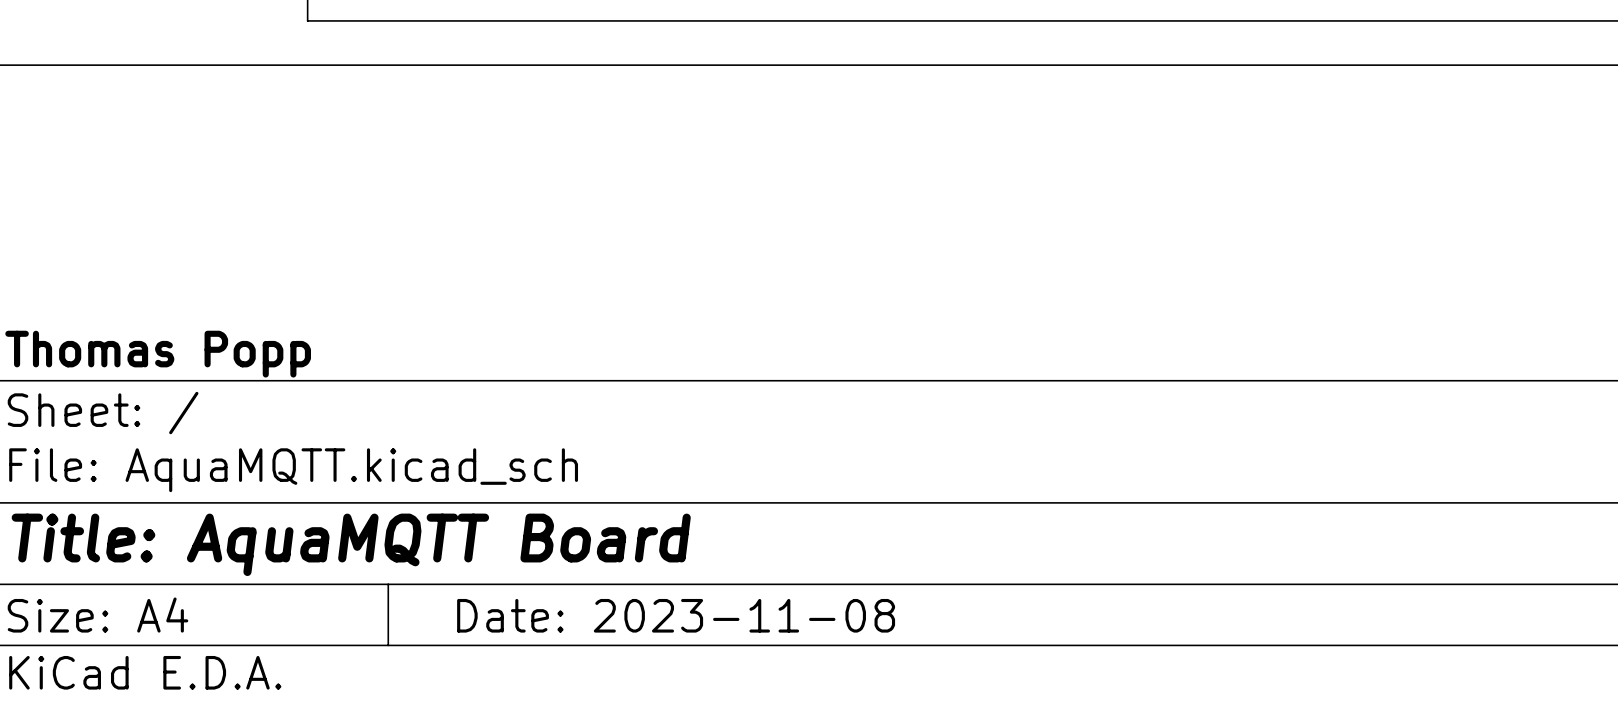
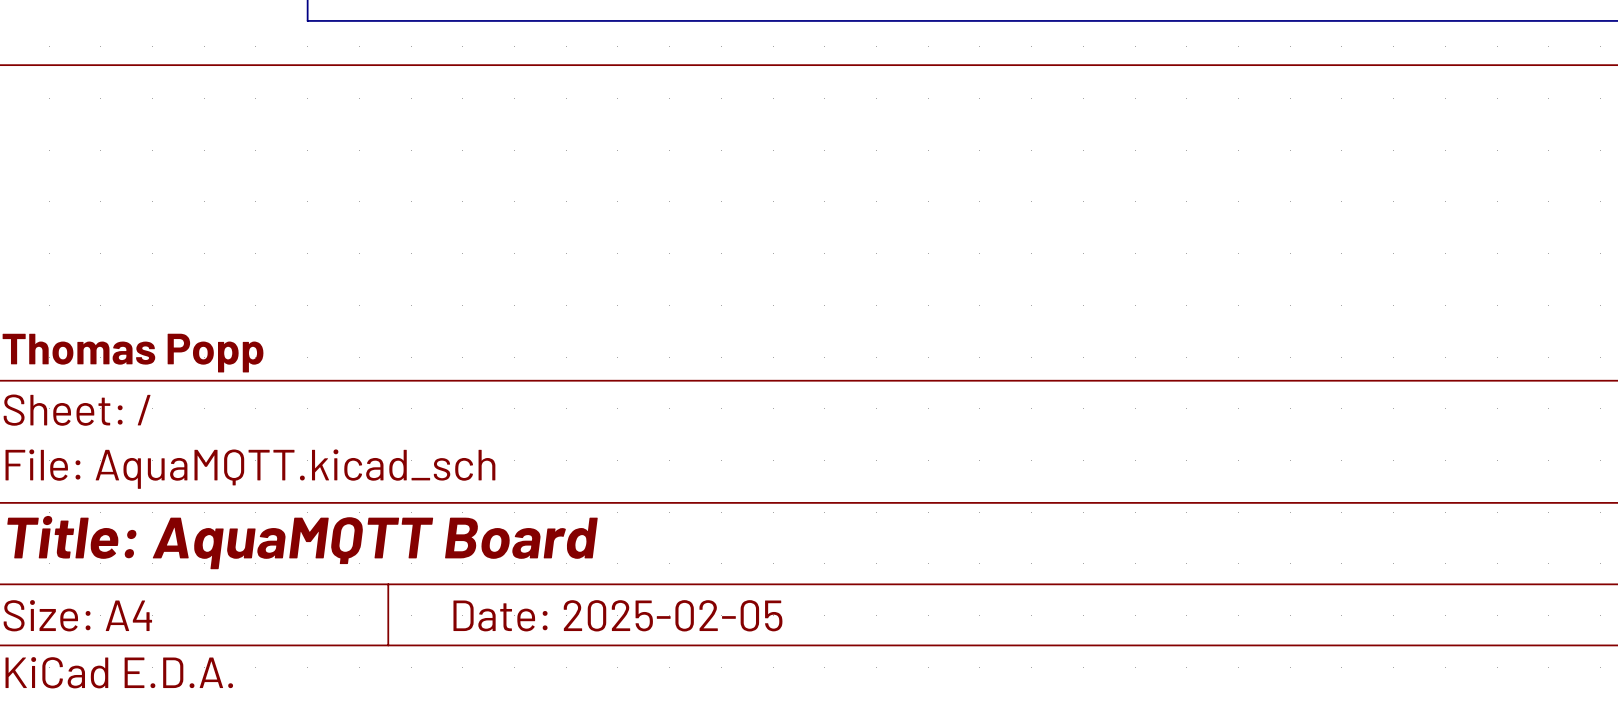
title block: Date: 2023-11-08 (676, 615) -> Date: 2025-02-05 (617, 615)

